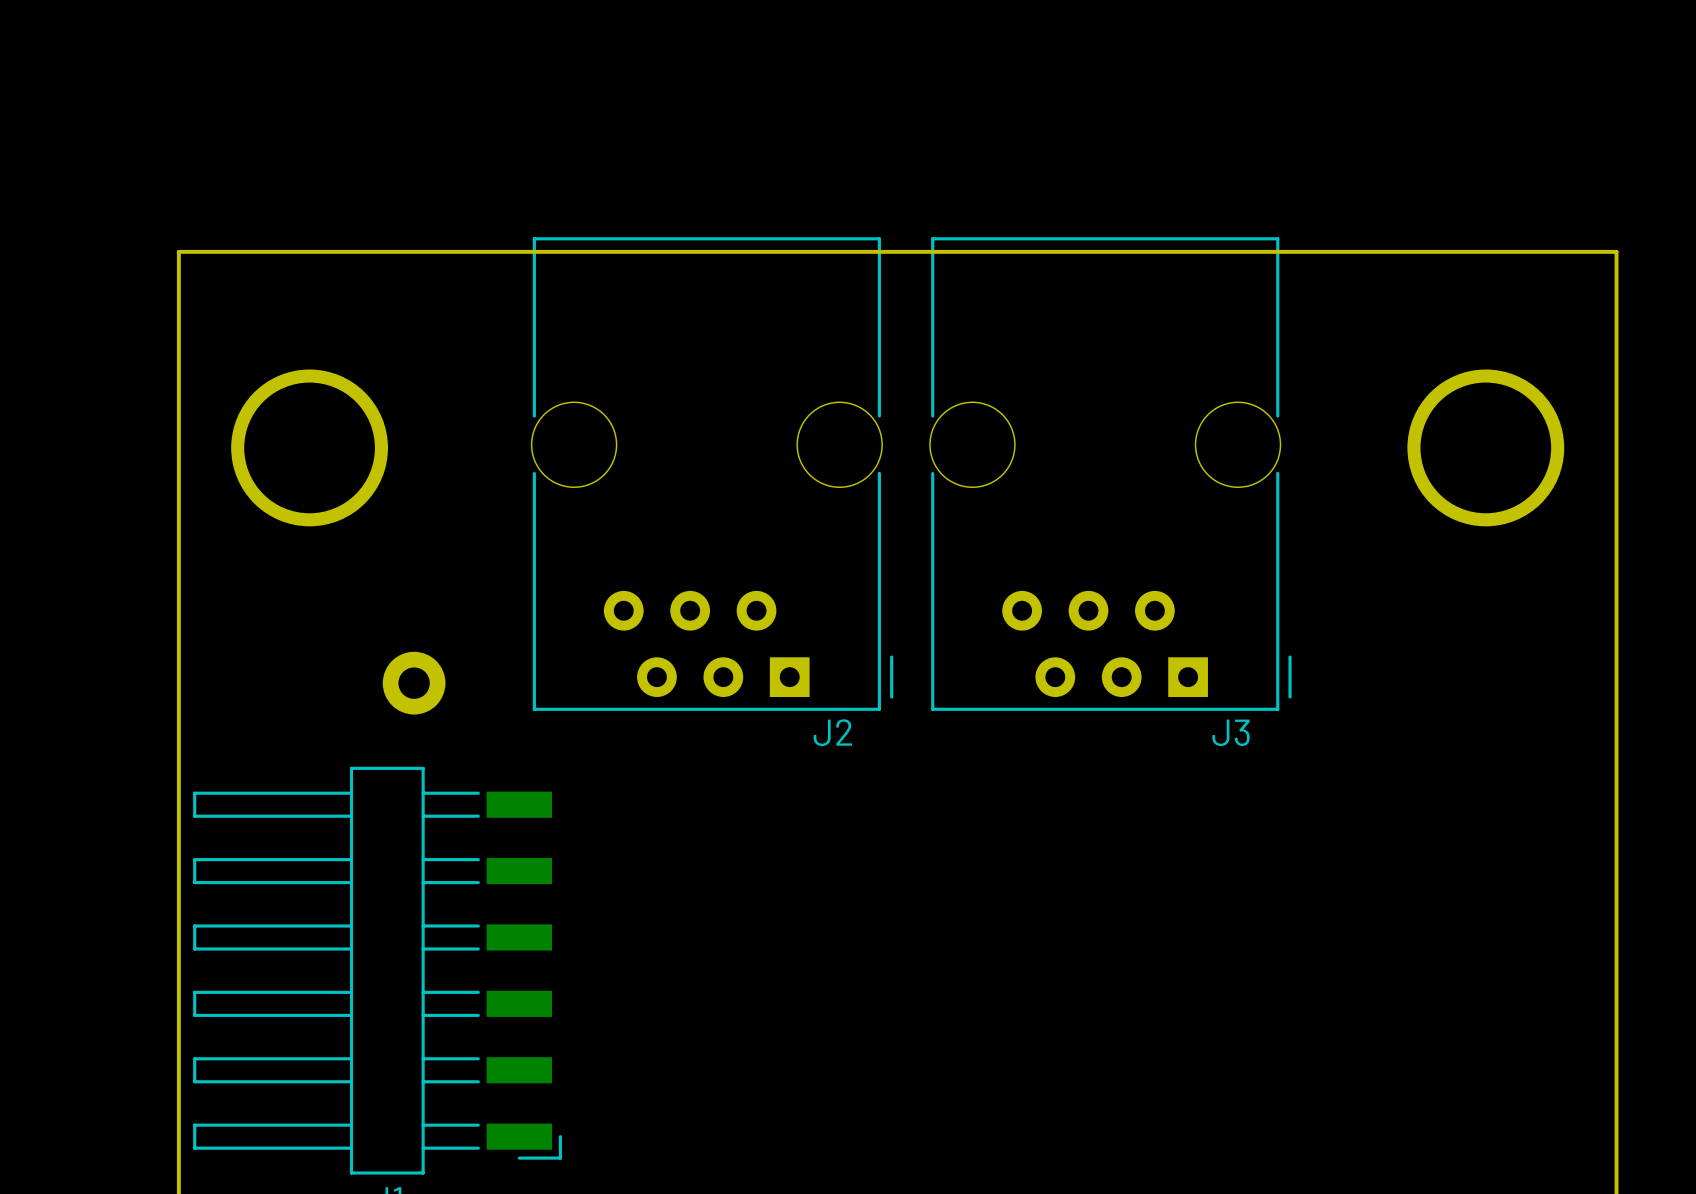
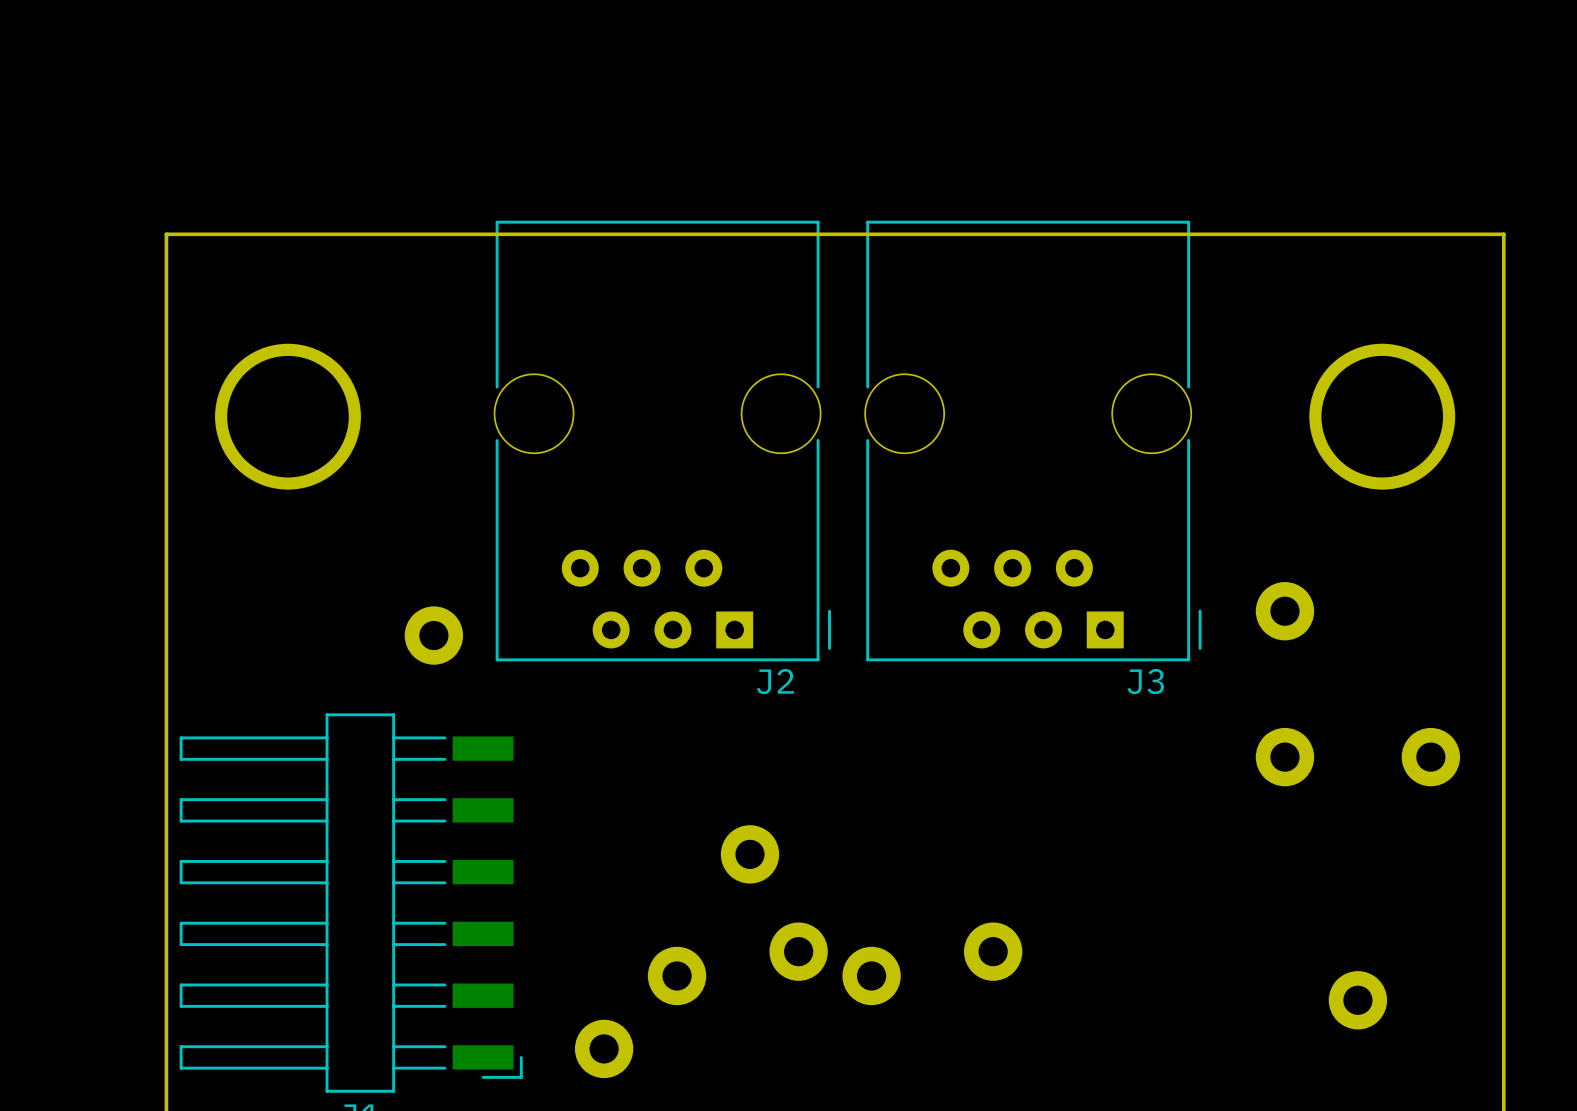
part: none -> (1284, 611)
part position: (414, 683) -> (433, 635)
part: none -> (1284, 757)
part: none -> (1430, 757)
part: none -> (750, 854)
part: none -> (798, 951)
part: none -> (993, 951)
part: none -> (677, 975)
part: none -> (871, 975)
part: none -> (1357, 1000)
part: none -> (604, 1048)

